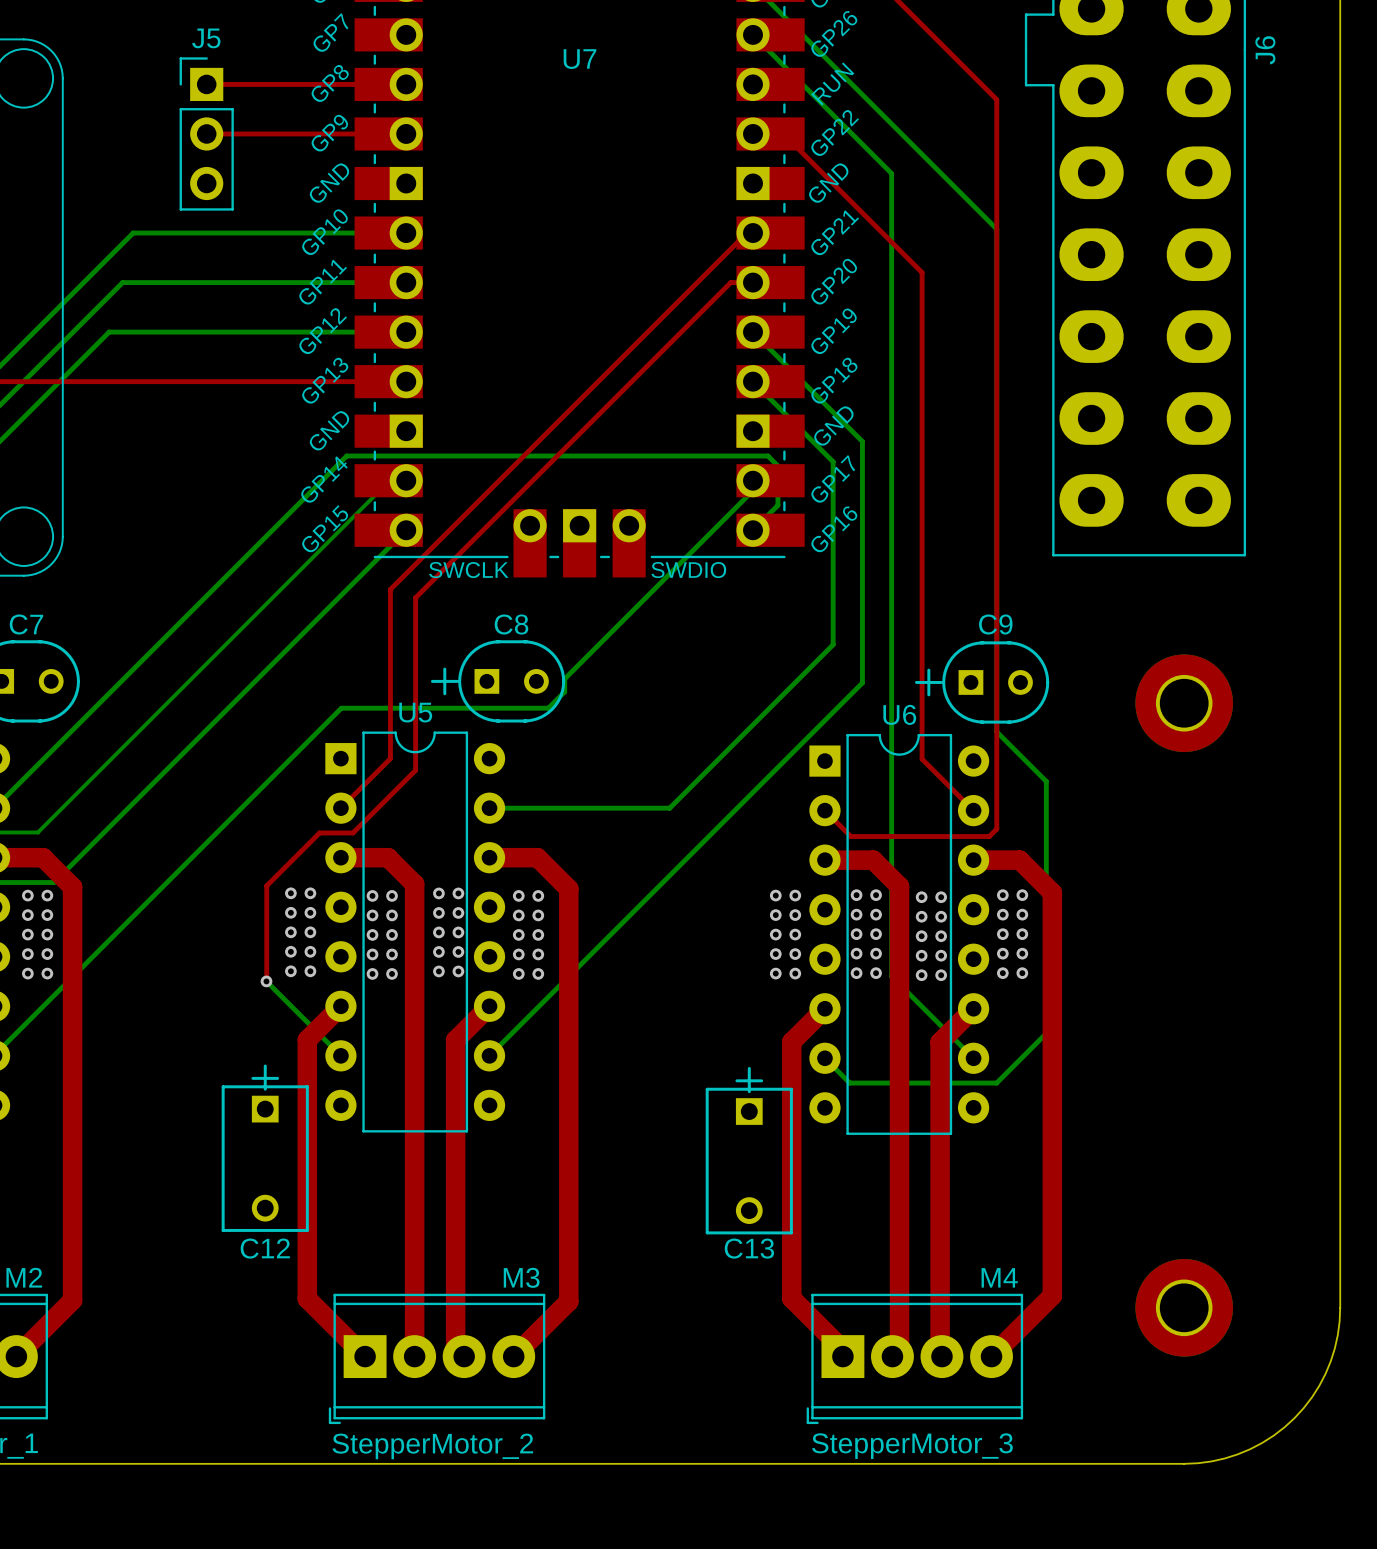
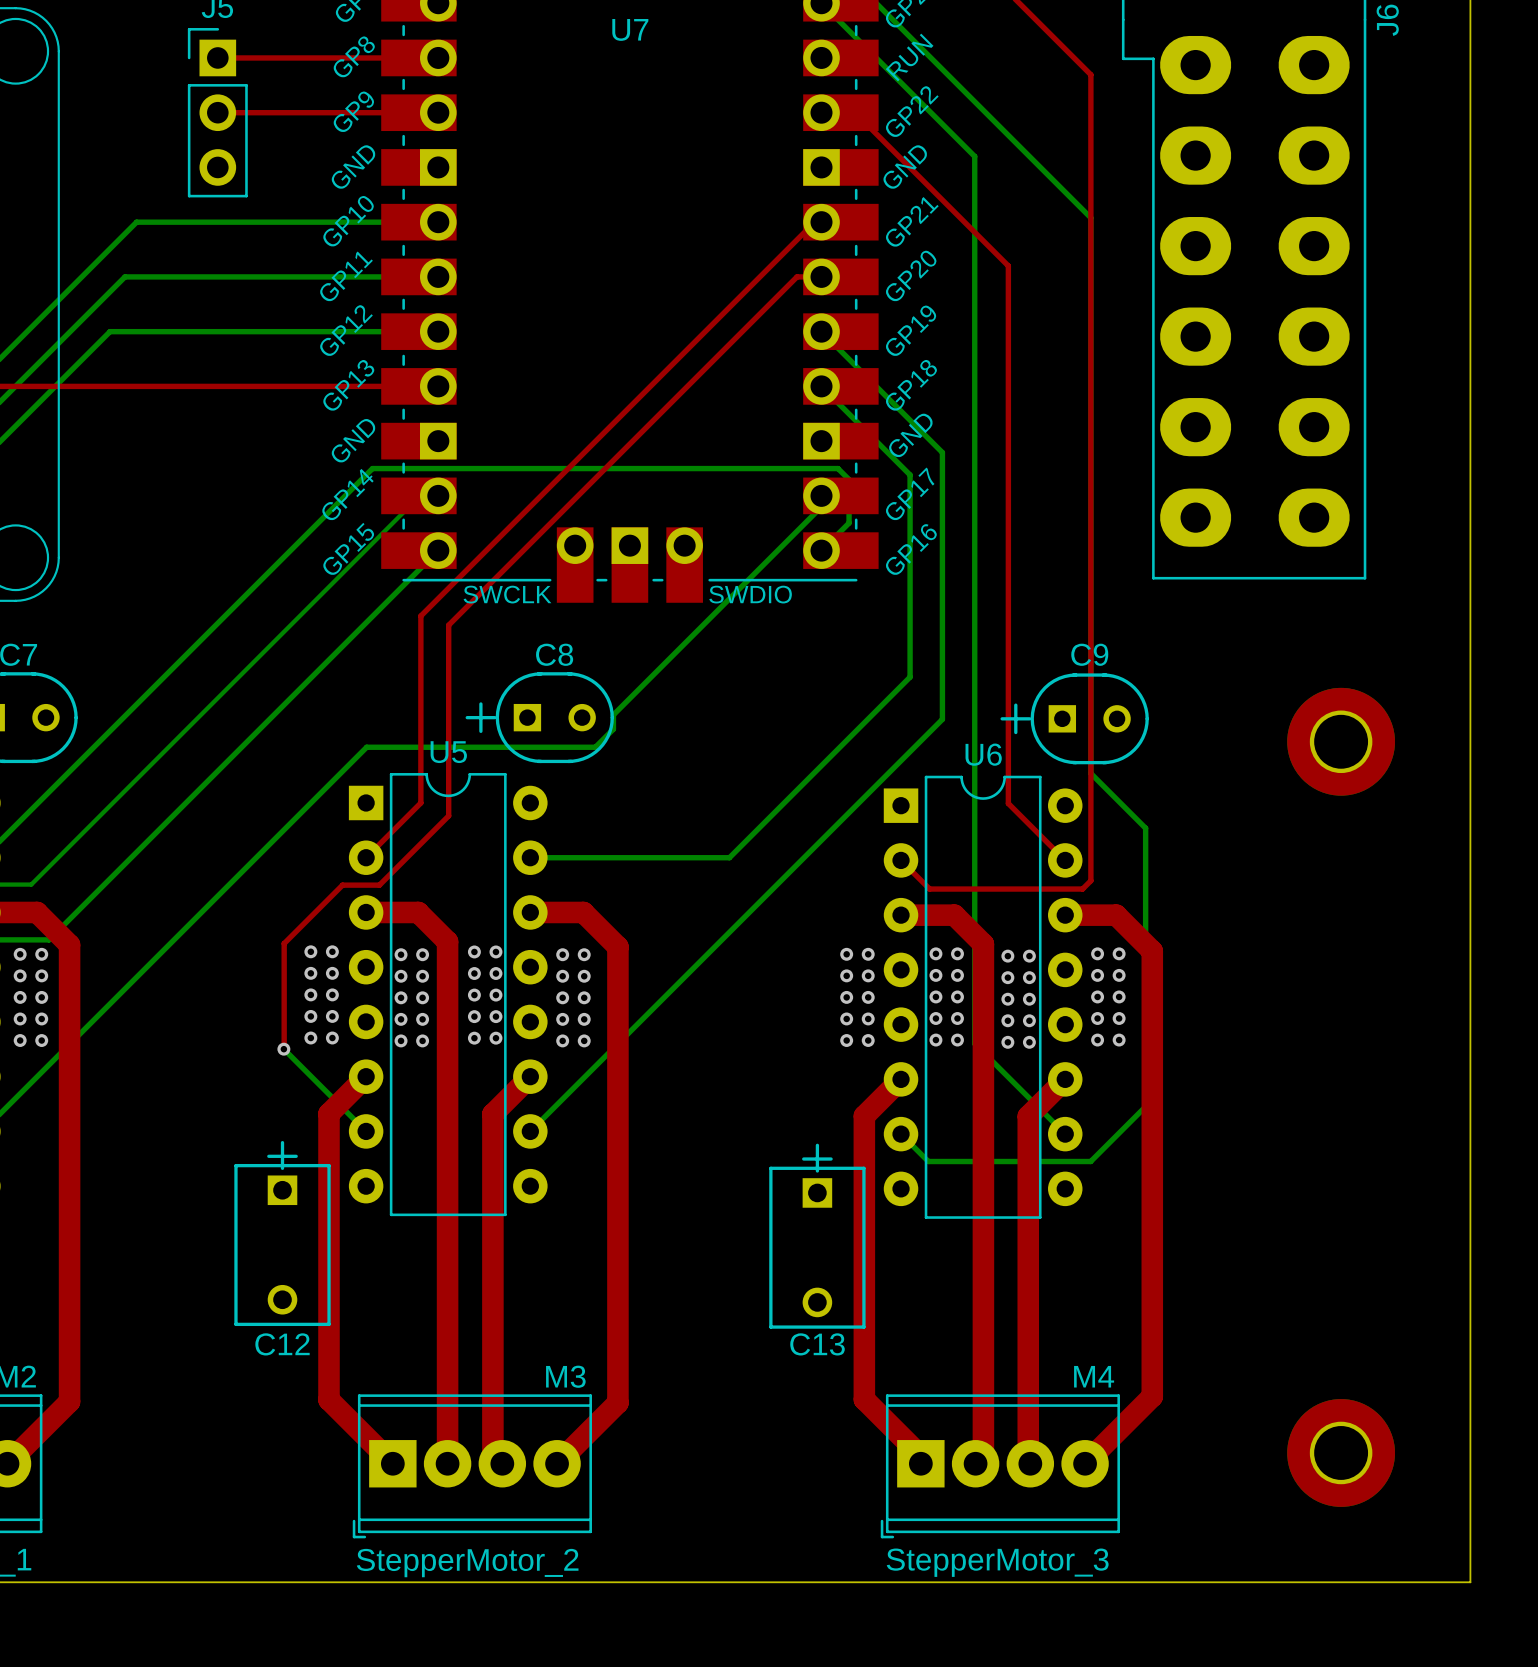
part position: (1184, 703) -> (1341, 741)
part position: (1184, 1307) -> (1341, 1452)
board edge: (1340, 1307) (1337, 1334) (1330, 1361) (1312, 1397) (1294, 1418) (1273, 1435) (1237, 1454) (1211, 1461) (1184, 1463) -> (1470, 1409) (1470, 1582) (1298, 1582)

